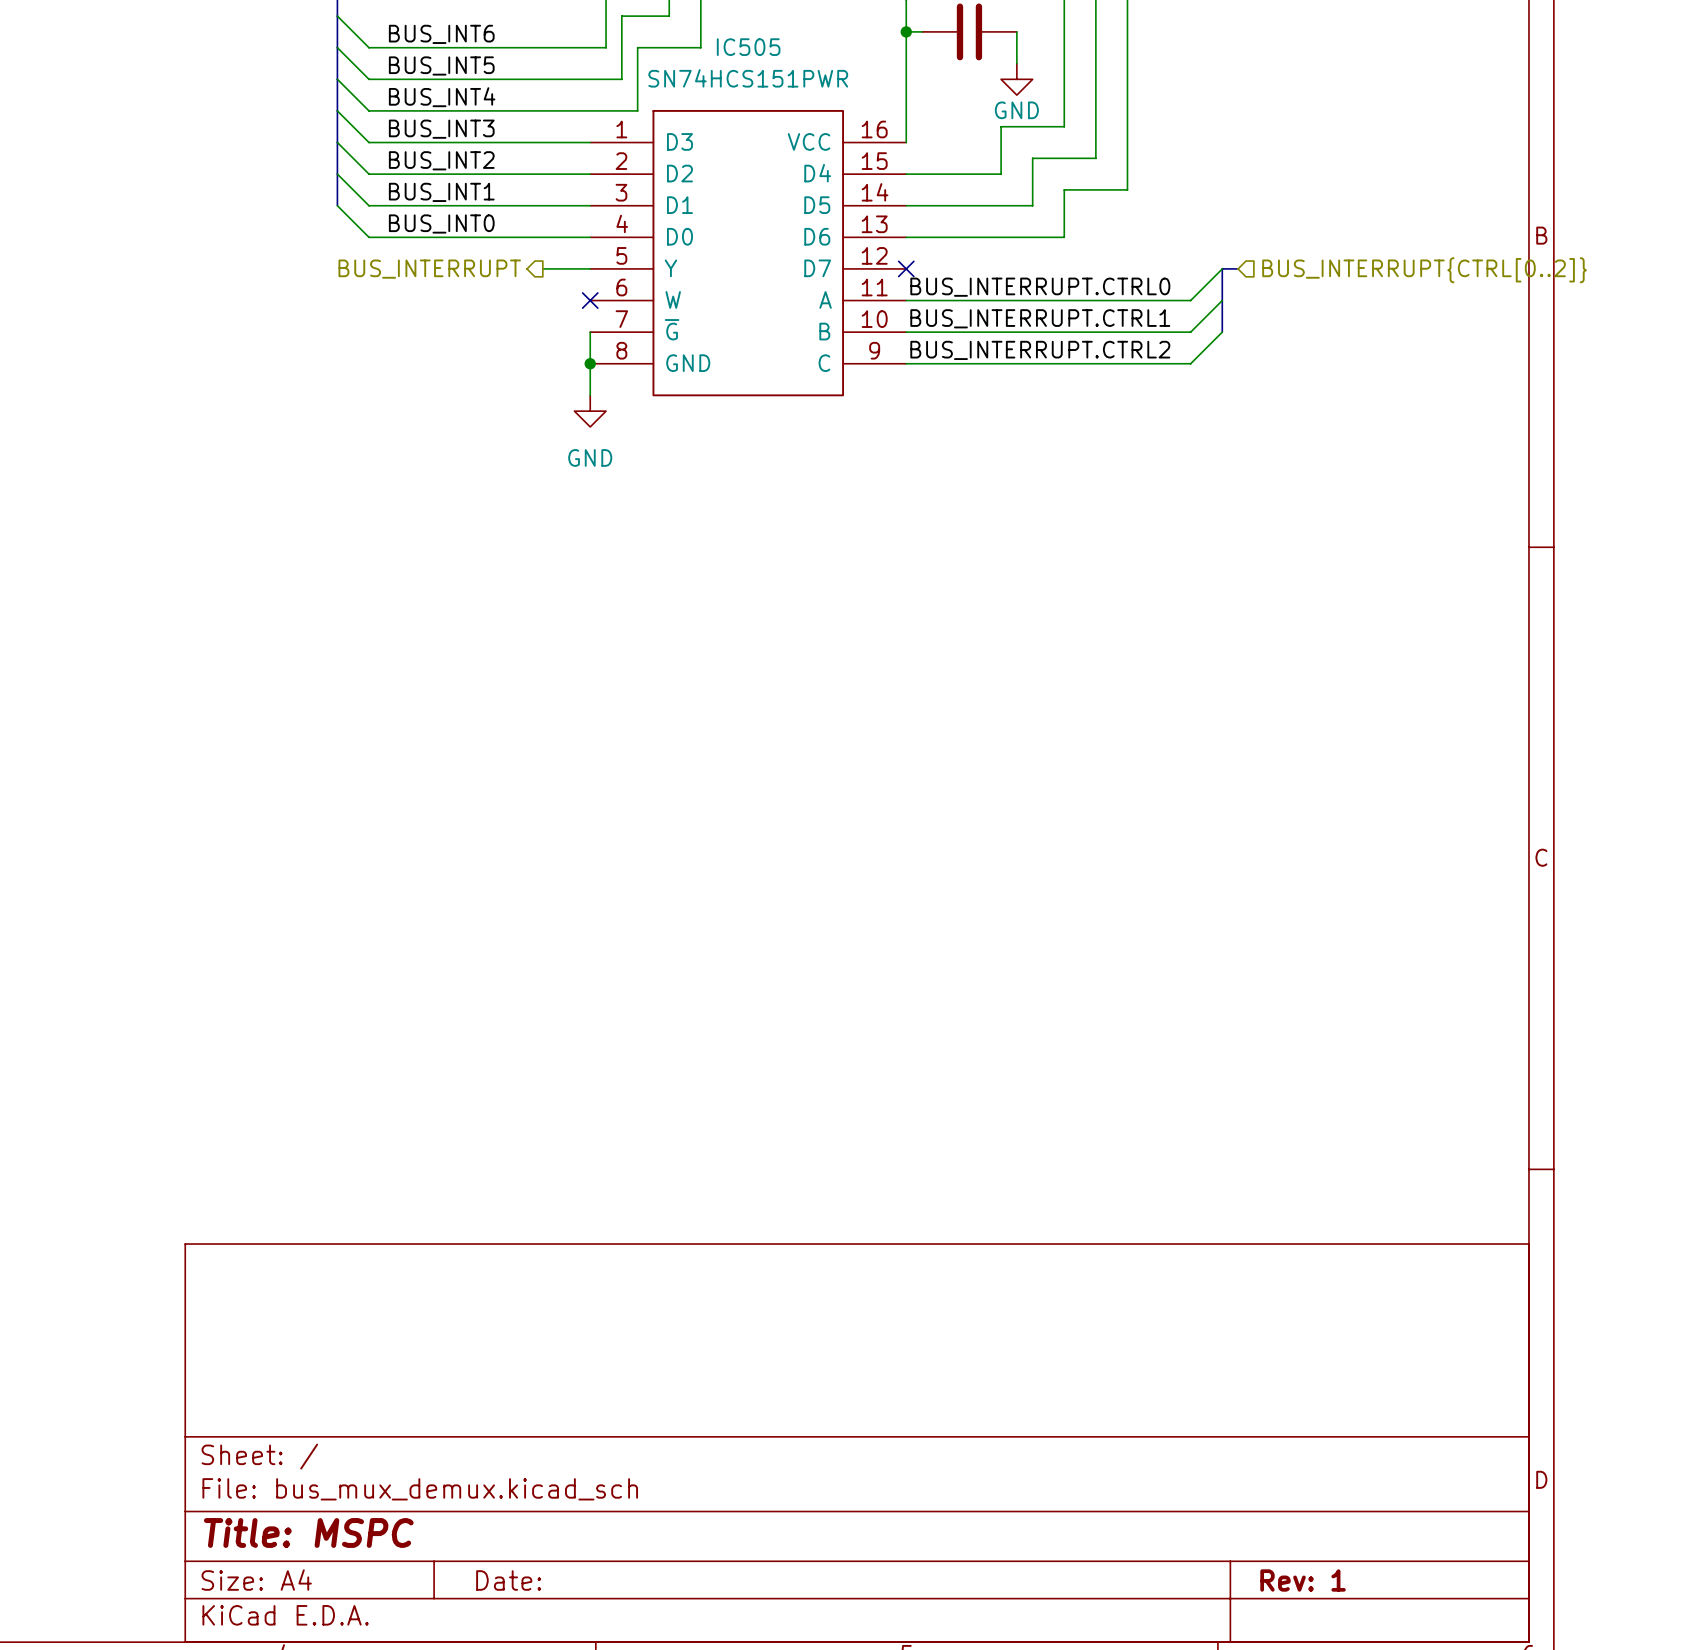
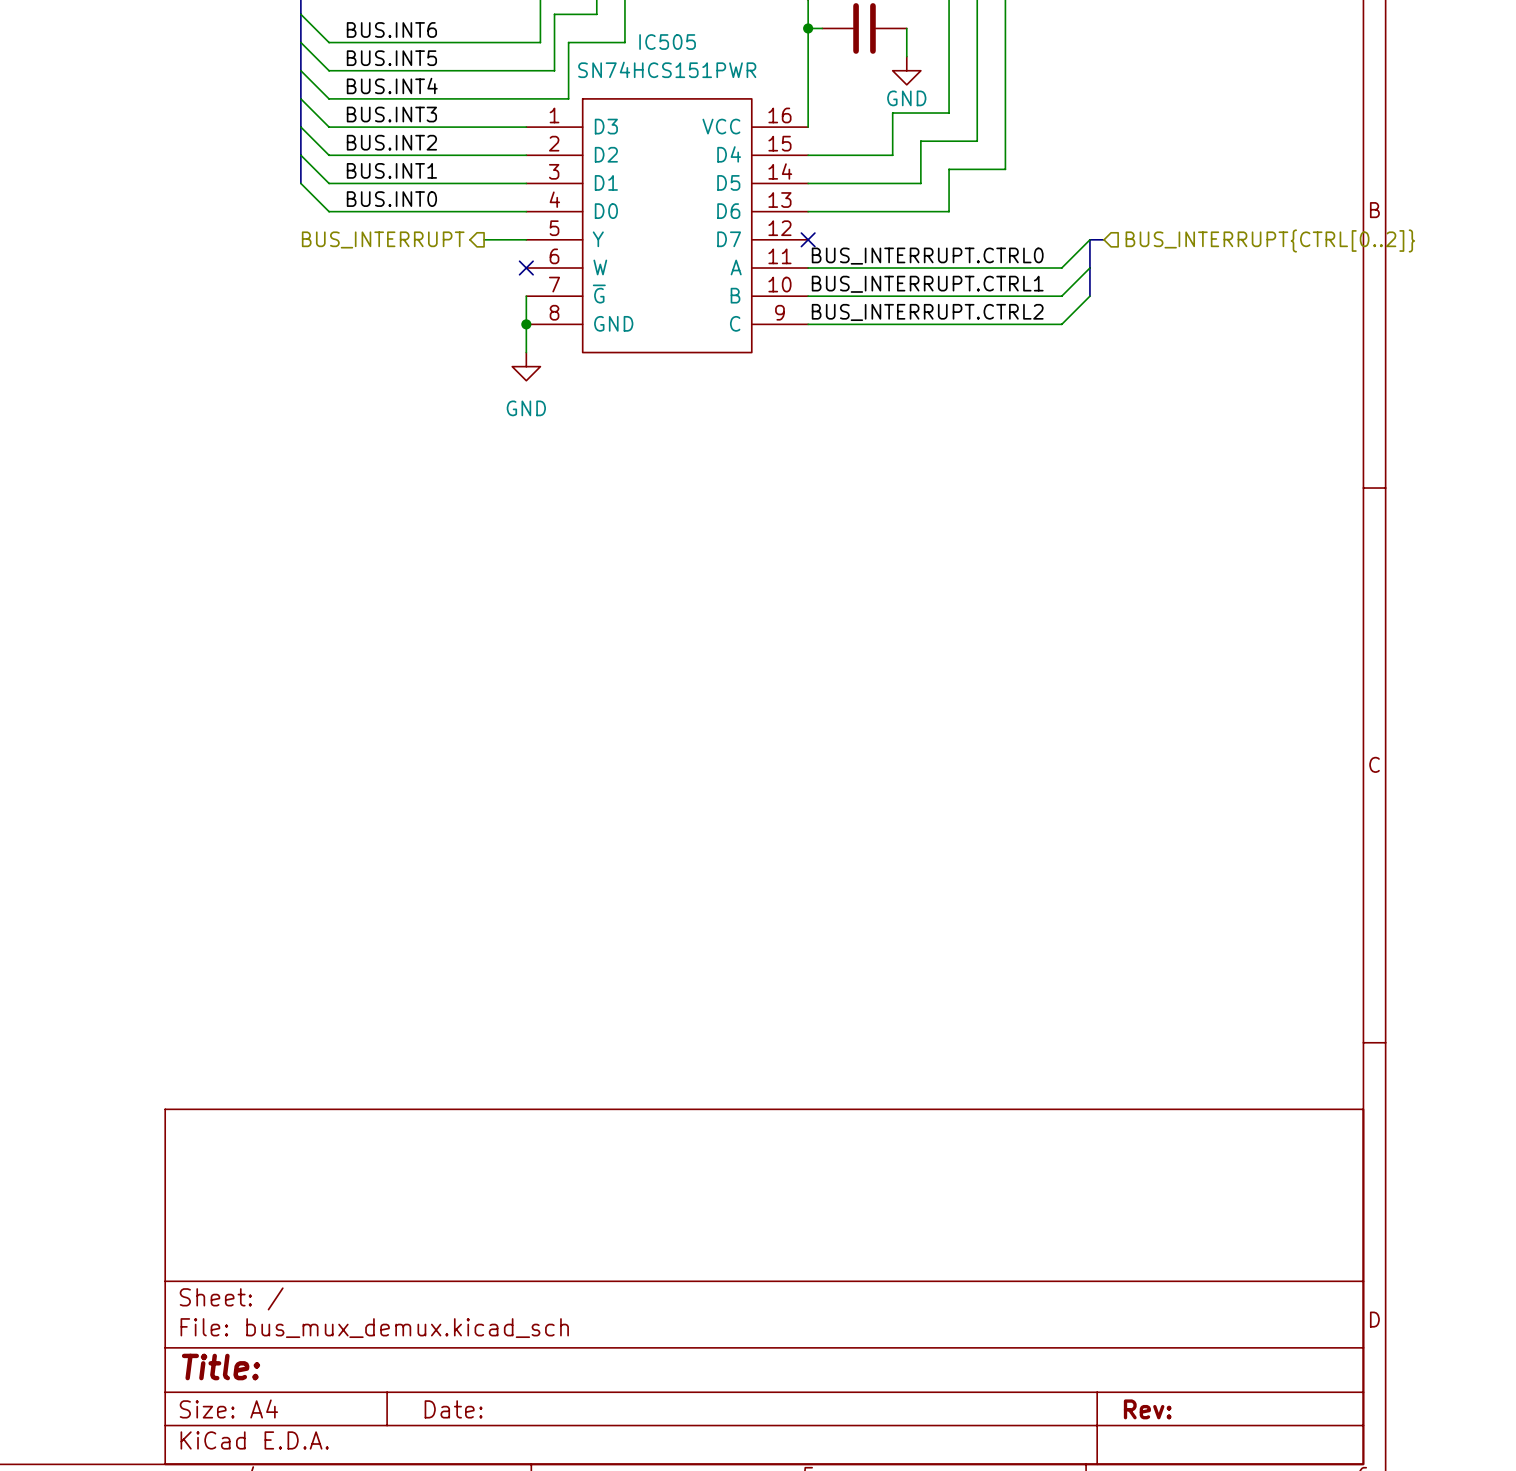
label: BUS_INT6 (441, 34) -> BUS.INT6 (391, 29)
label: BUS_INT5 (441, 65) -> BUS.INT5 (391, 58)
label: BUS_INT4 (442, 97) -> BUS.INT4 (392, 86)
label: BUS_INT3 (441, 129) -> BUS.INT3 (391, 114)
label: BUS_INT2 (441, 160) -> BUS.INT2 (391, 142)
label: BUS_INT1 (441, 192) -> BUS.INT1 (391, 170)
label: BUS_INT0 (441, 223) -> BUS.INT0 (391, 199)
title block: Title: MSPC (308, 1532) -> Title: (221, 1367)
title block: Rev: 1 (1303, 1580) -> Rev: (1147, 1409)

